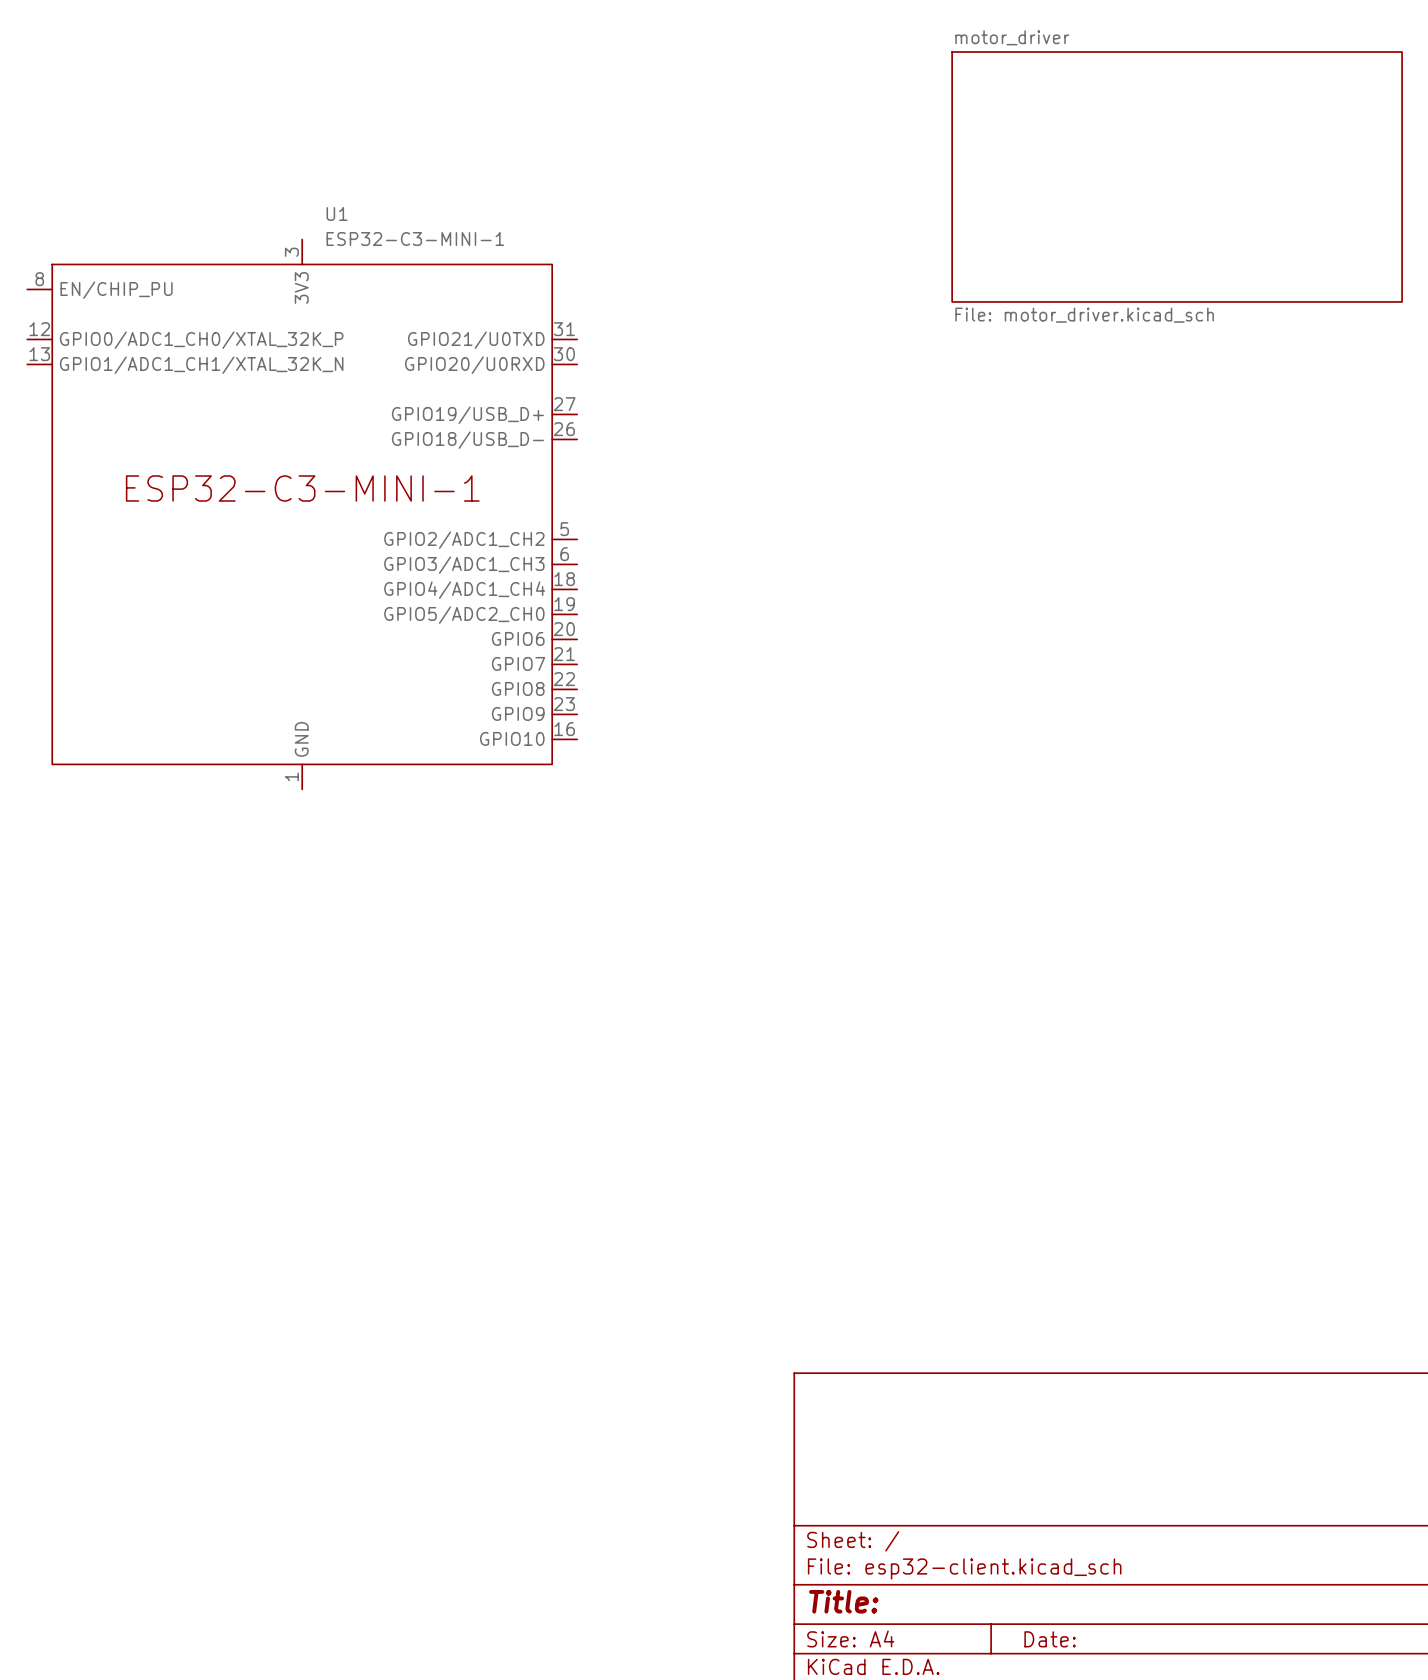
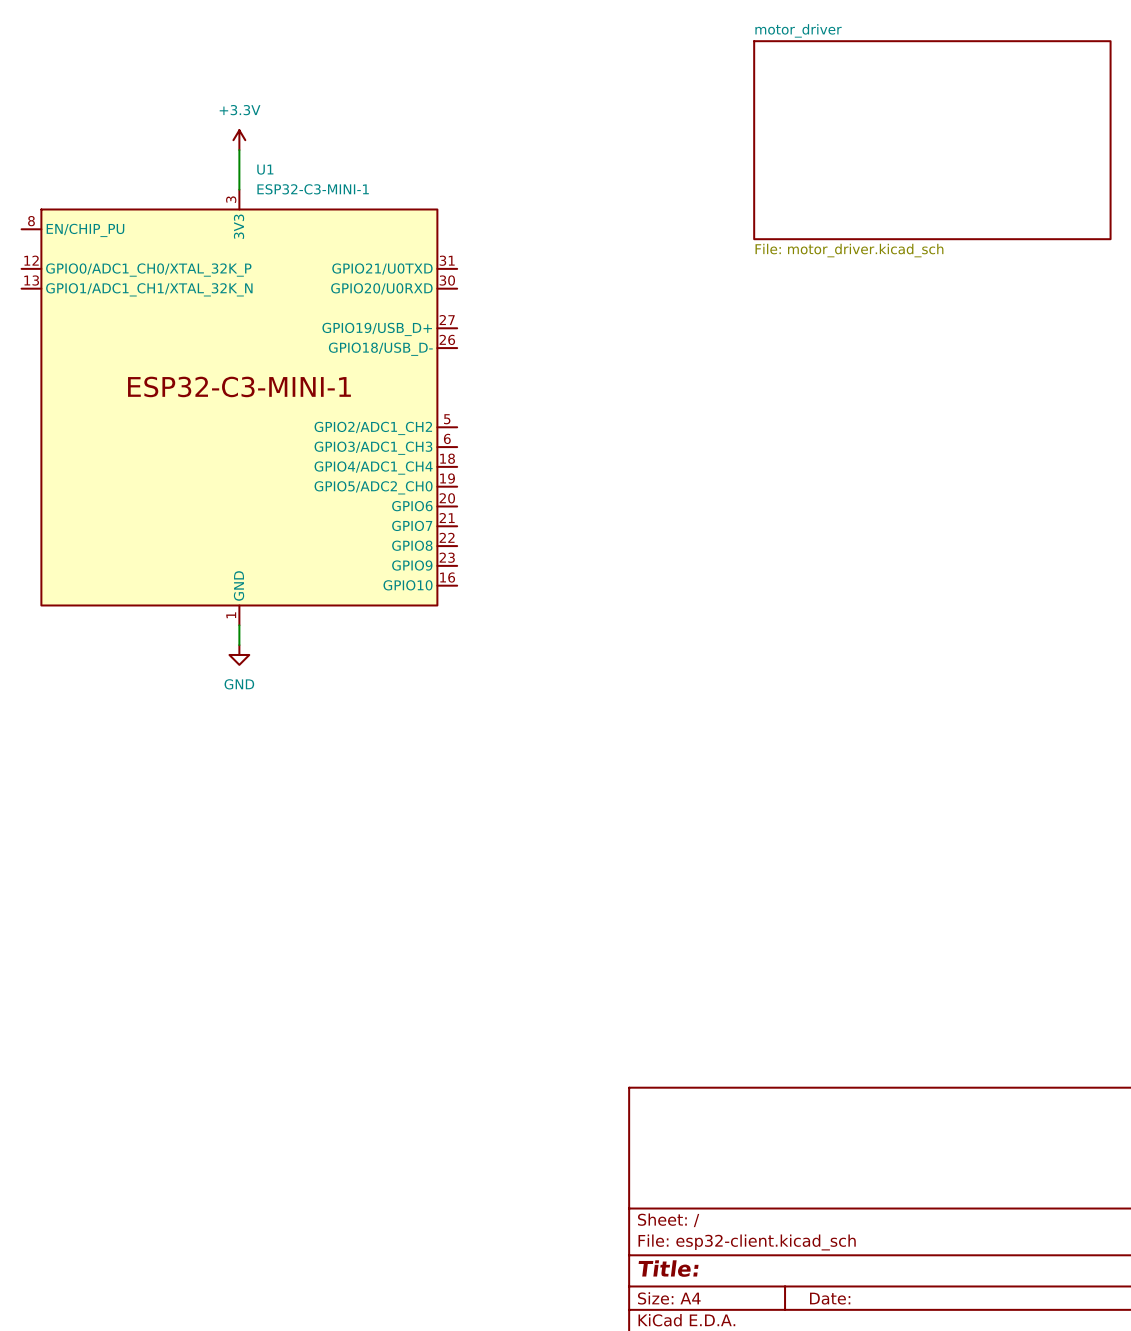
power symbol: none -> +3.3V (239, 140)
wire: none -> (239, 150) (239, 189)
wire: none -> (239, 625) (239, 645)
power symbol: none -> GND (239, 654)

